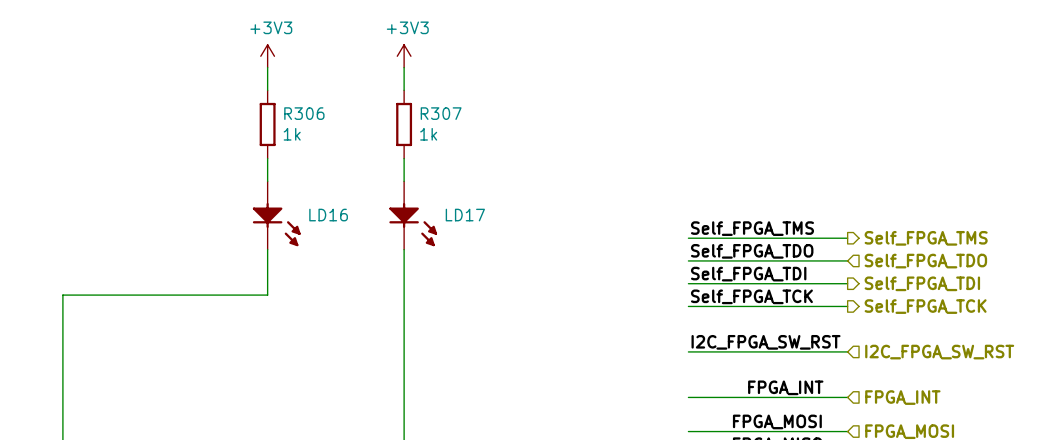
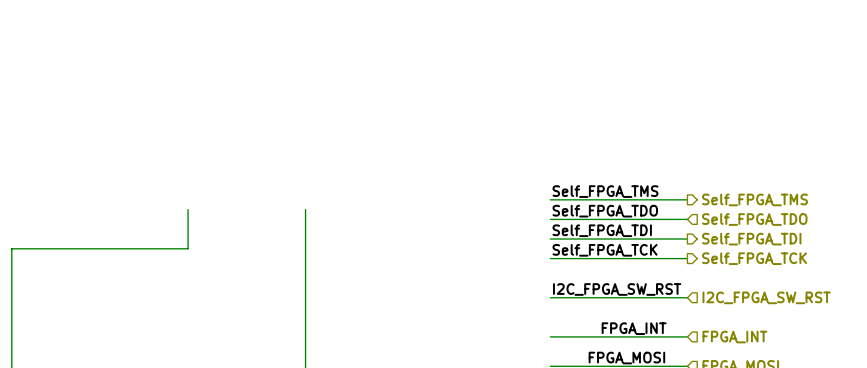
power symbol: +3V3 (267, 56) -> none
power symbol: +3V3 (404, 56) -> none
wire: (267, 67) (267, 90) -> none
wire: (404, 67) (404, 90) -> none
R306: (267, 124) -> none
R307: (404, 124) -> none
wire: (267, 158) (267, 181) -> none
wire: (404, 158) (404, 181) -> none
LD16: (276, 215) -> none
LD17: (413, 215) -> none

